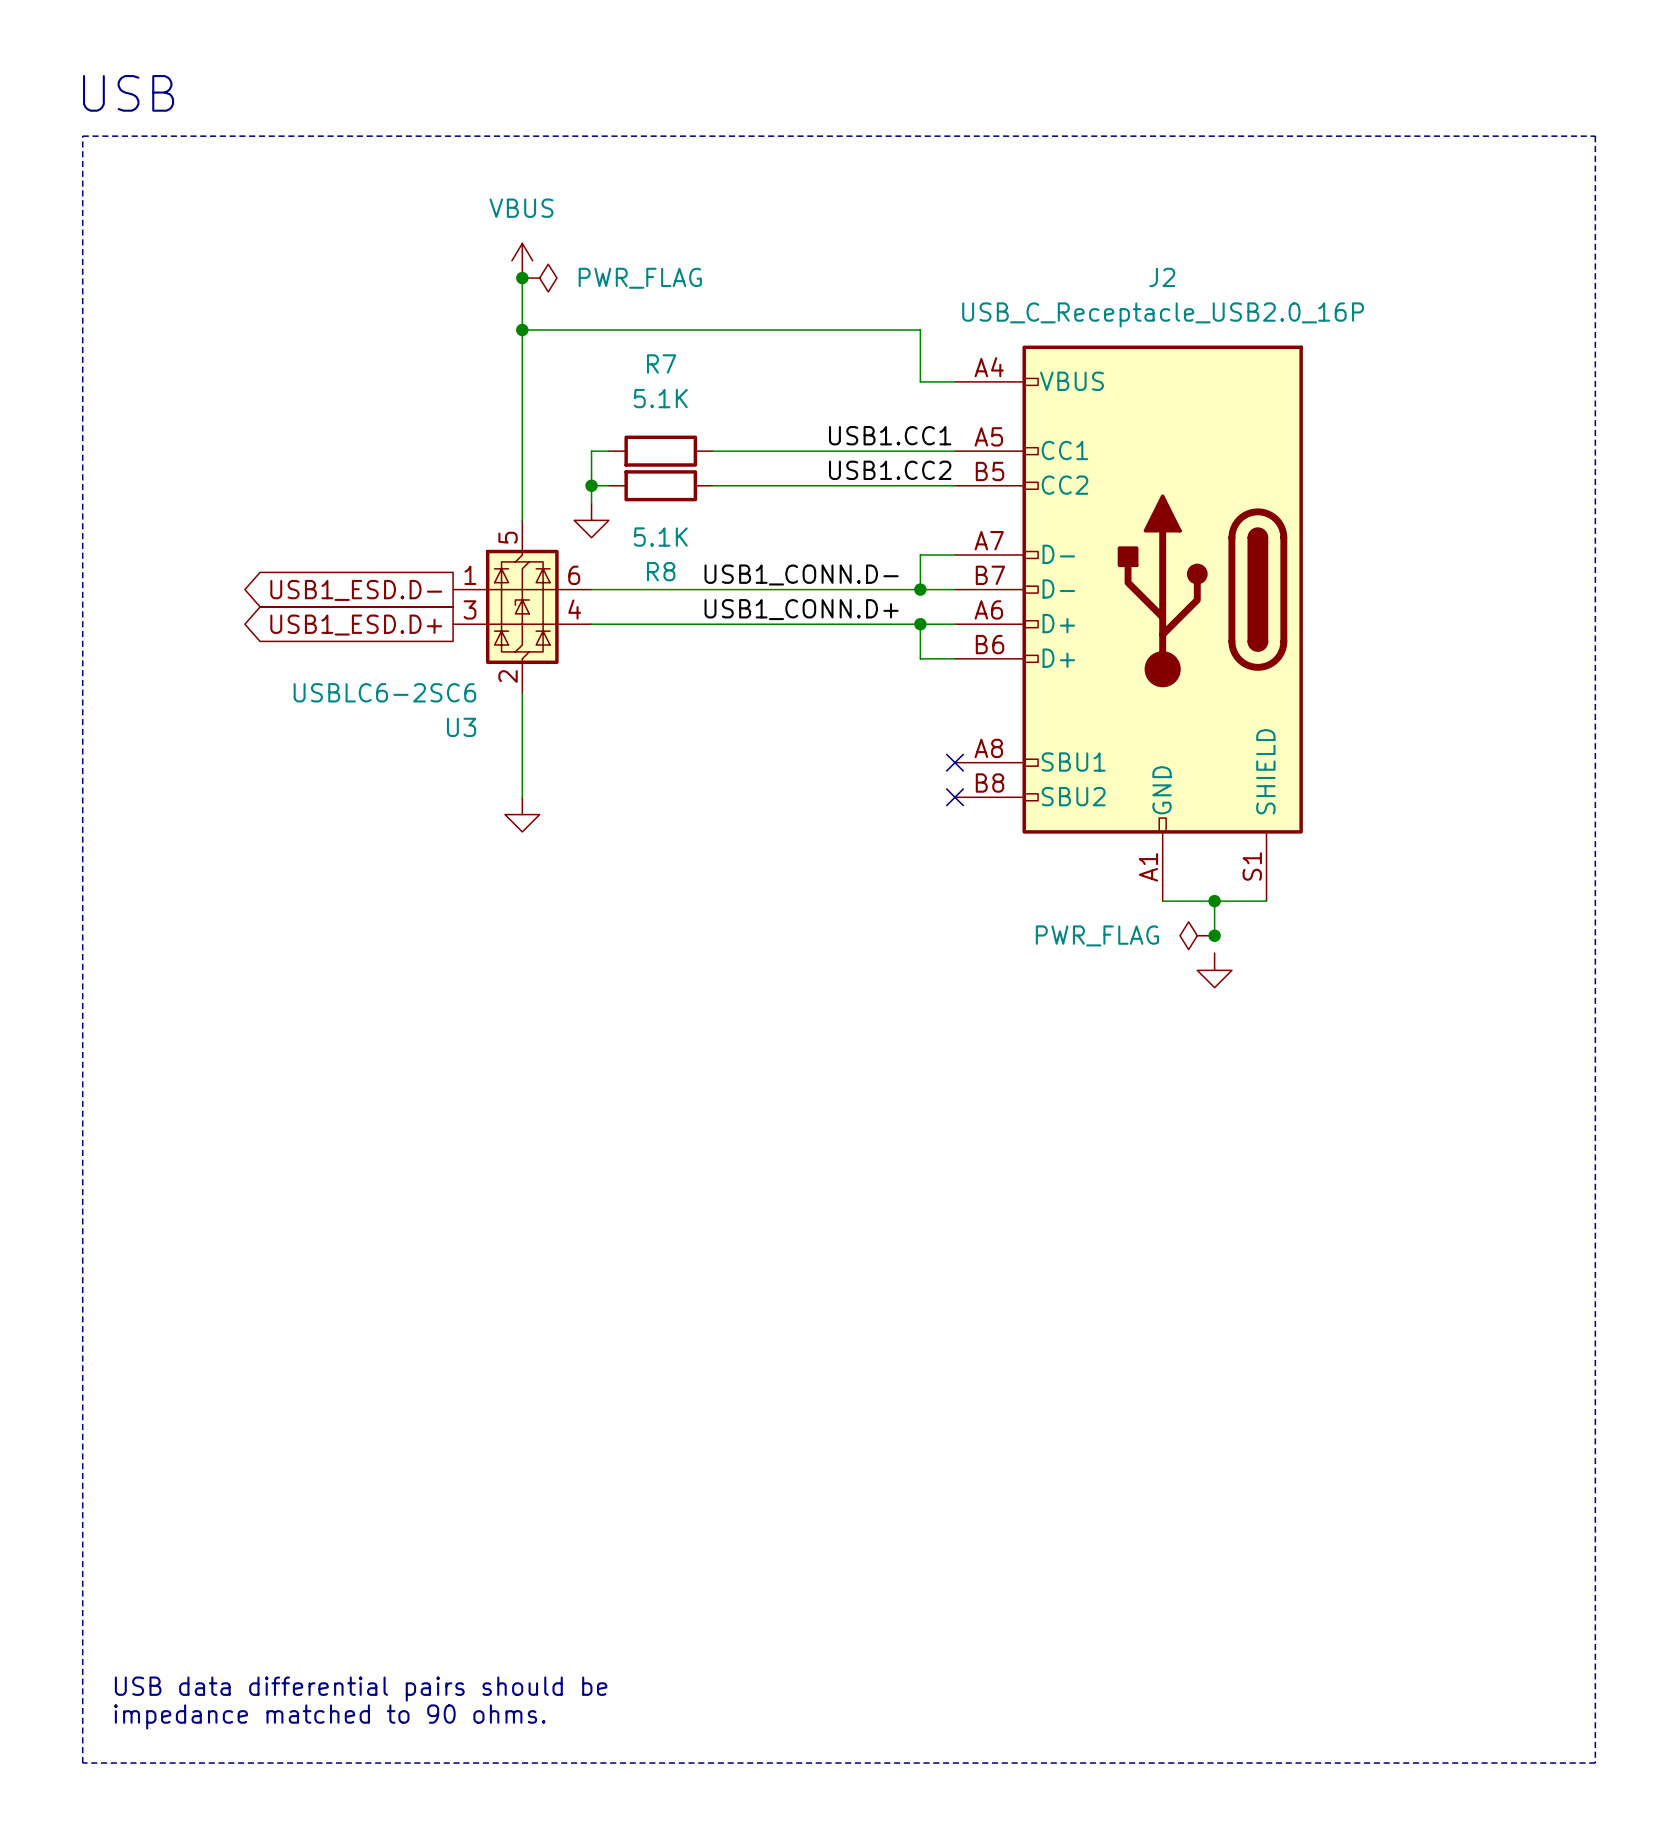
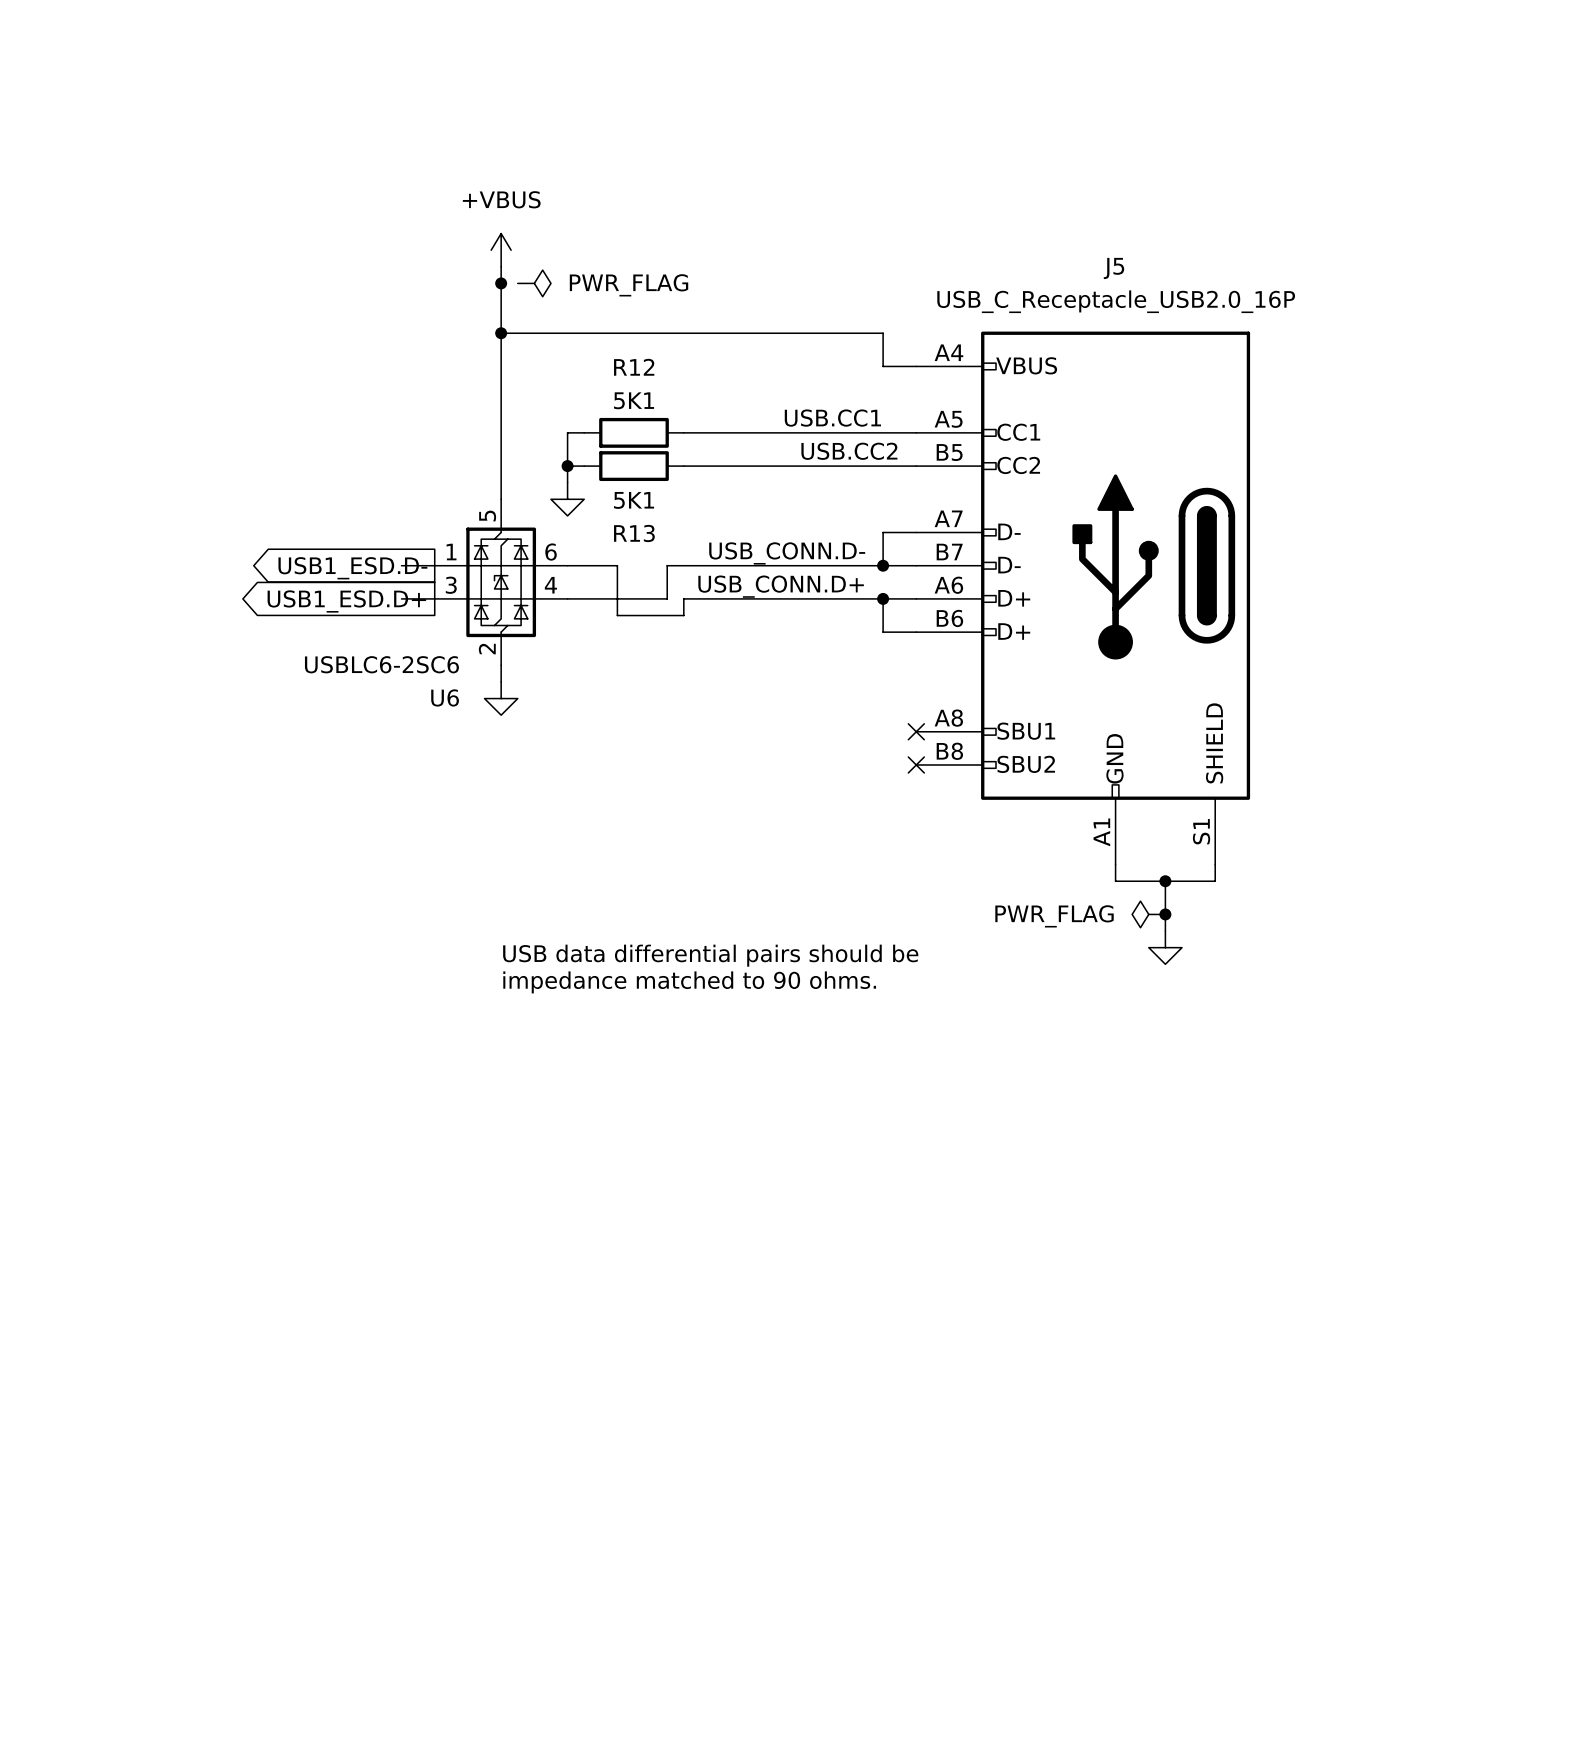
text: USB (128, 93) -> none
line: (82, 136) (1595, 136) (1595, 1763) (82, 1763) (82, 136) -> none
power symbol: VBUS (522, 260) -> +VBUS (501, 250)
J2 name: J2 (1162, 277) -> J5 (1113, 268)
junction: (522, 278) -> none
power symbol position: PWR_FLAG (539, 278) -> PWR_FLAG (534, 283)
junction: none -> (501, 283)
wire: (522, 330) (920, 330) (920, 347) -> (501, 333) (883, 333)
junction: (522, 330) -> none
junction: none -> (501, 333)
R7 name: R7 (661, 363) -> R12 (634, 367)
R7 text: 5.1K (660, 398) -> 5K1 (634, 400)
label: none -> USB.CC1 (832, 418)
label: USB1.CC1 (890, 435) -> none
label: USB1.CC2 (890, 470) -> USB.CC2 (849, 451)
R8 text: 5.1K (660, 537) -> 5K1 (634, 500)
R8 name: R8 (661, 571) -> R13 (634, 533)
label: USB1_CONN.D- (801, 574) -> USB_CONN.D- (787, 553)
wire: none -> (401, 565) (434, 565)
wire: (643, 589) (695, 589) -> (617, 565) (617, 615) (683, 615) (683, 598)
label: USB1_CONN.D+ (801, 609) -> USB_CONN.D+ (781, 586)
wire: none -> (401, 598) (434, 598)
wire: (695, 624) (712, 624) -> (667, 598) (667, 565)
wire: (522, 710) (522, 797) -> none
U3 name: U3 (461, 727) -> U6 (445, 697)
power symbol position: (522, 814) -> (501, 698)
wire: (1162, 901) (1266, 901) -> (1115, 864) (1115, 881) (1215, 881) (1215, 864)
wire: (1214, 901) (1214, 918) -> none
junction: (1214, 901) -> none
junction: none -> (1165, 881)
power symbol position: PWR_FLAG (1197, 935) -> PWR_FLAG (1148, 914)
junction: (1214, 935) -> none
junction: none -> (1165, 914)
power symbol position: (1214, 970) -> (1165, 947)
text: none -> USB data differential pairs should be (710, 955)
text: none -> impedance matched to 90 ohms. (689, 982)
text: USB data differential pairs should be (361, 1689) -> none
text: impedance matched to 90 ohms. (329, 1716) -> none

